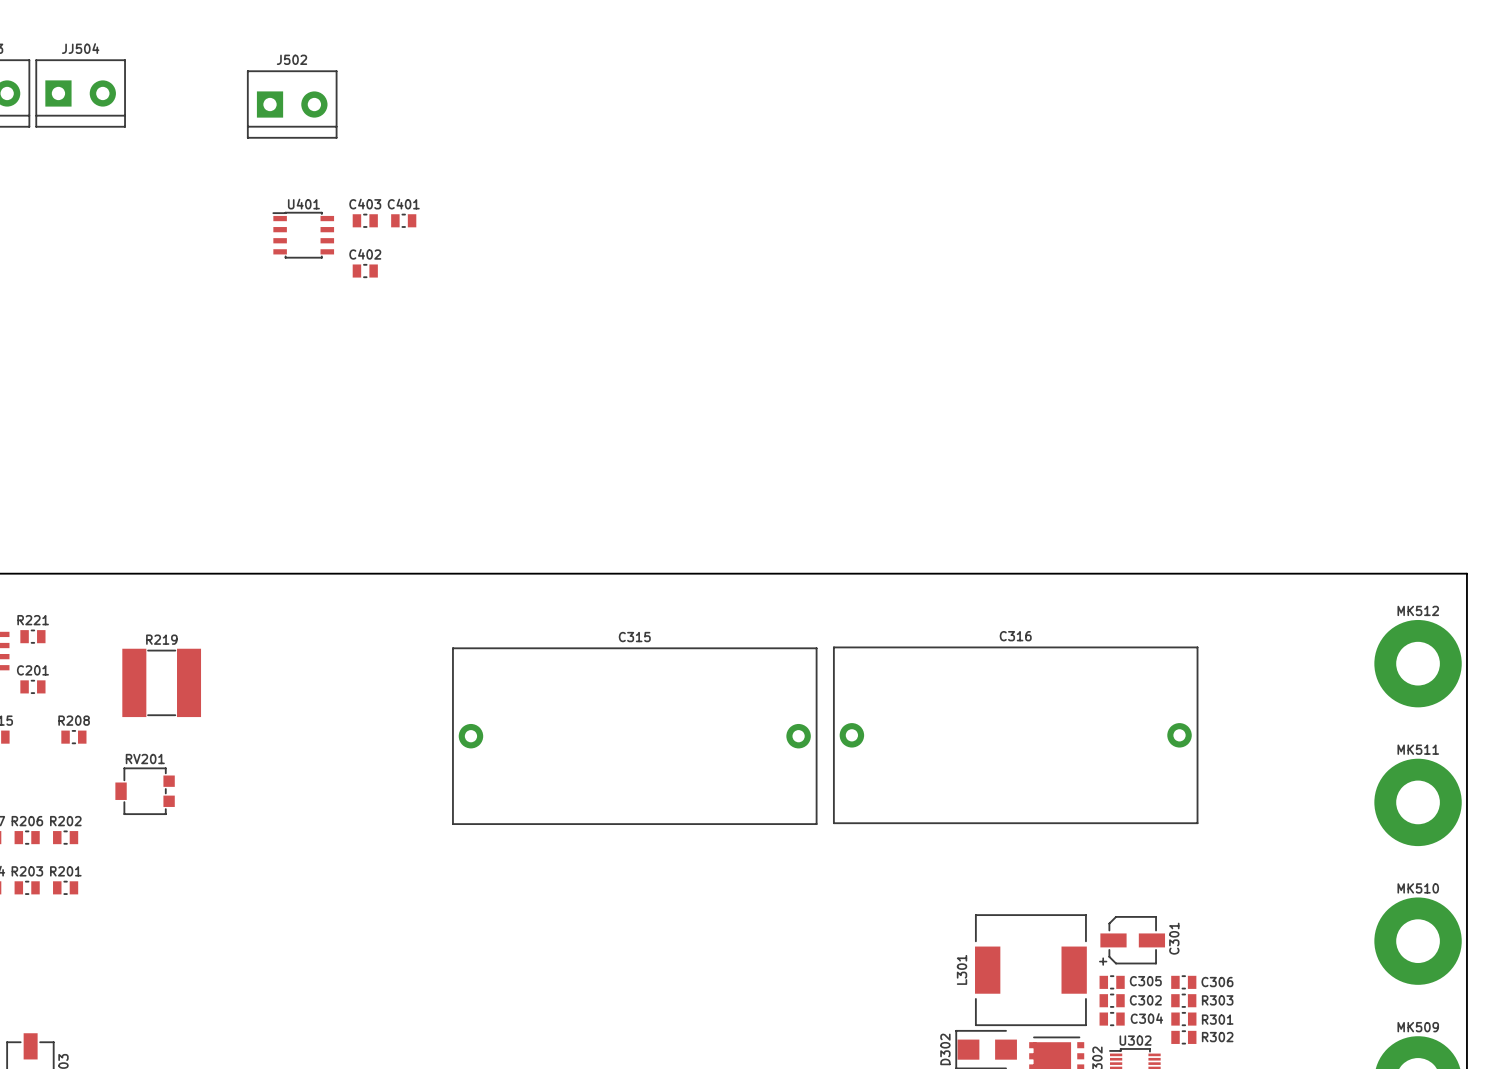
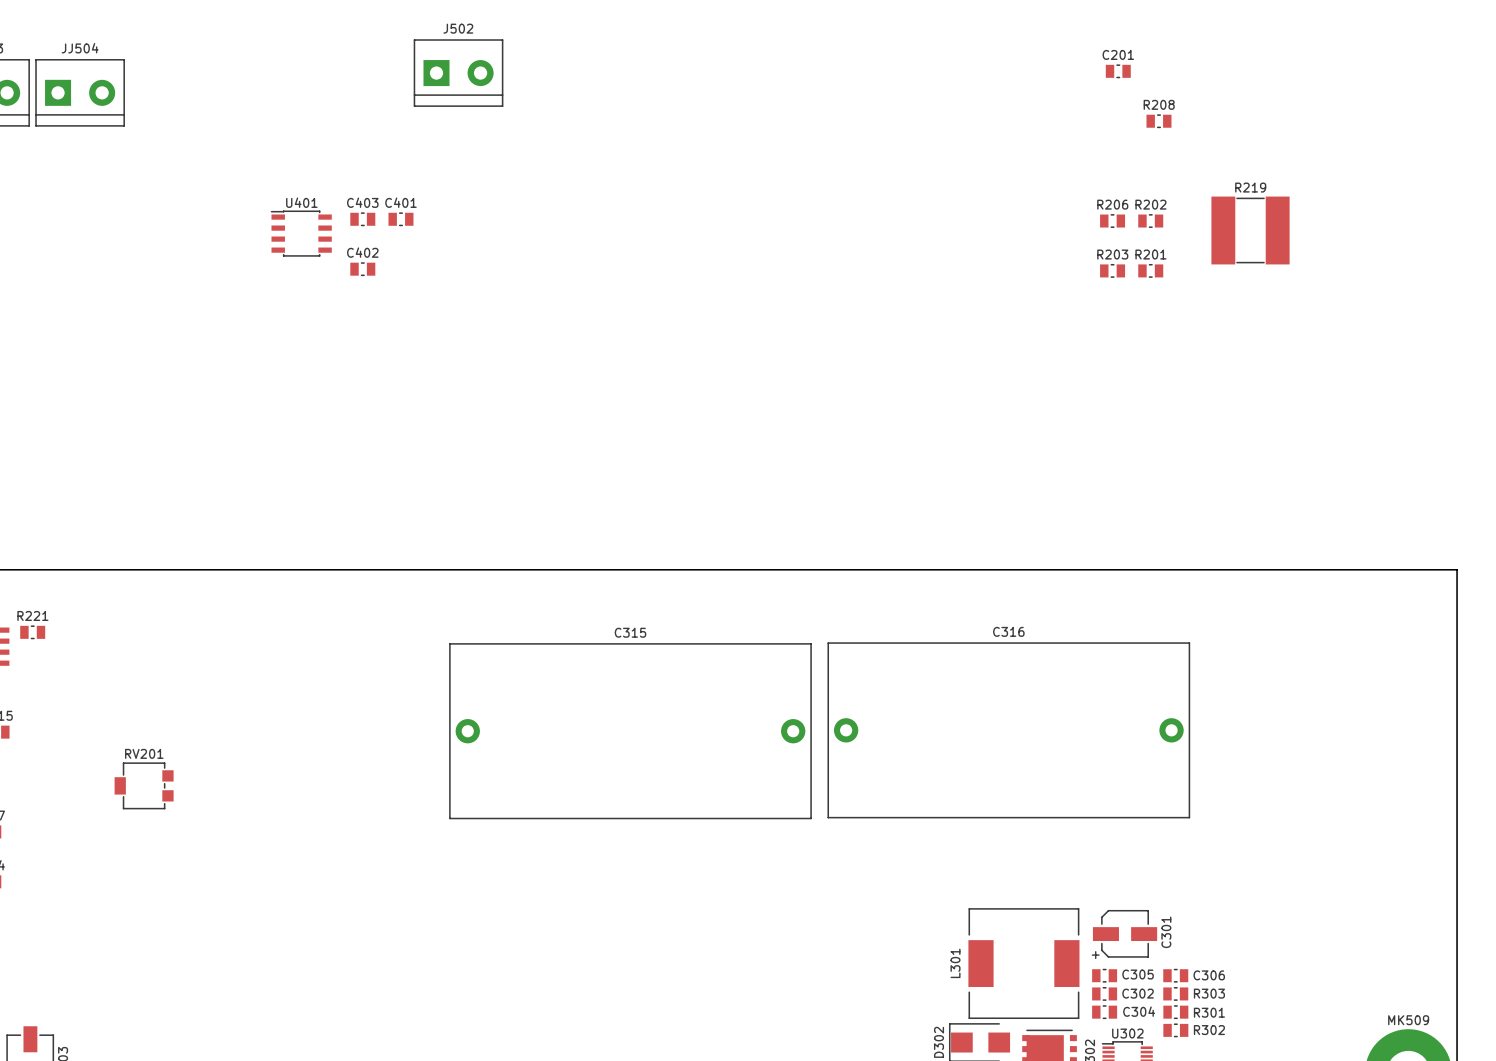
J502 position: (292, 104) -> (458, 73)
MK512: (1418, 663) -> none
R219 position: (161, 682) -> (1250, 230)
C201 position: (32, 686) -> (1118, 71)
R208 position: (73, 737) -> (1158, 121)
MK511: (1418, 802) -> none
R206 position: (27, 837) -> (1112, 221)
R202 position: (65, 837) -> (1150, 221)
R203 position: (27, 887) -> (1112, 270)
R201 position: (65, 887) -> (1150, 270)
MK510: (1418, 941) -> none

